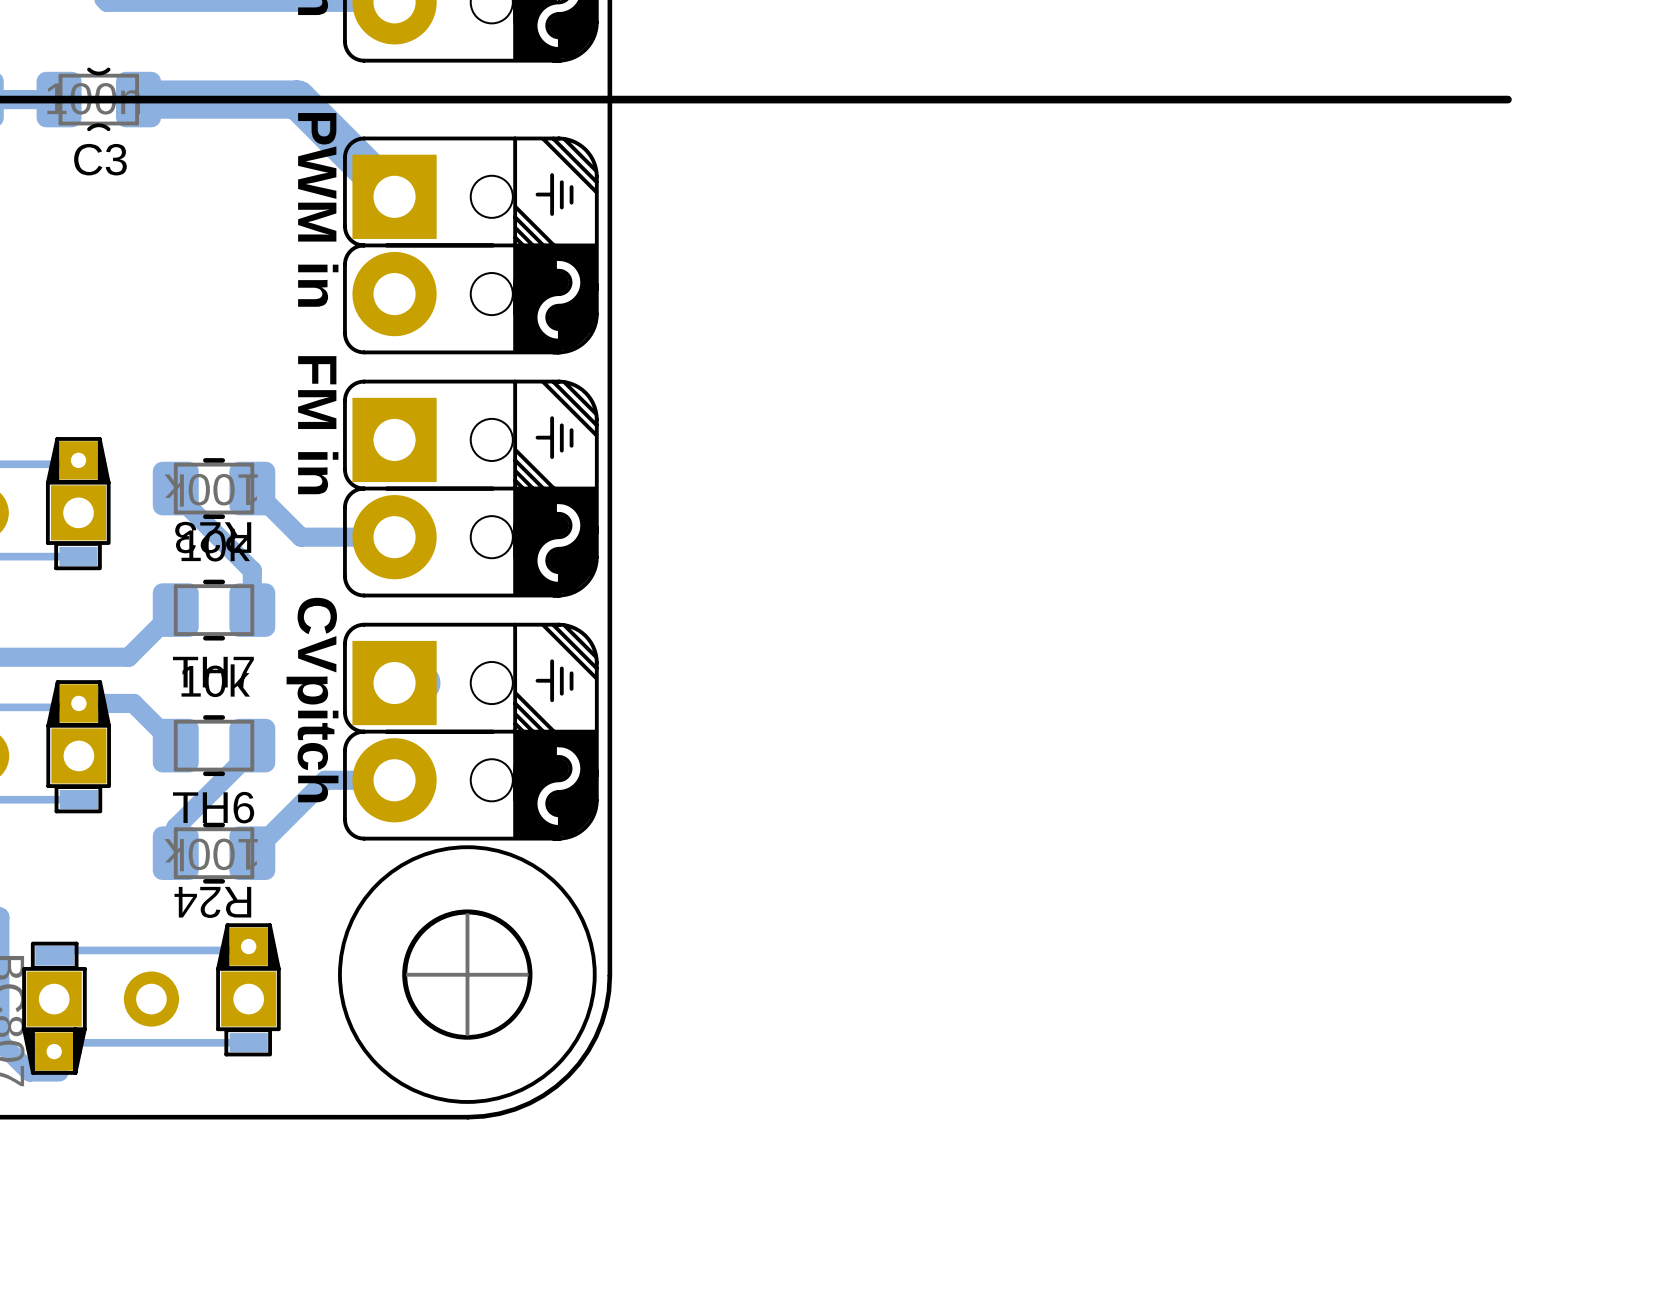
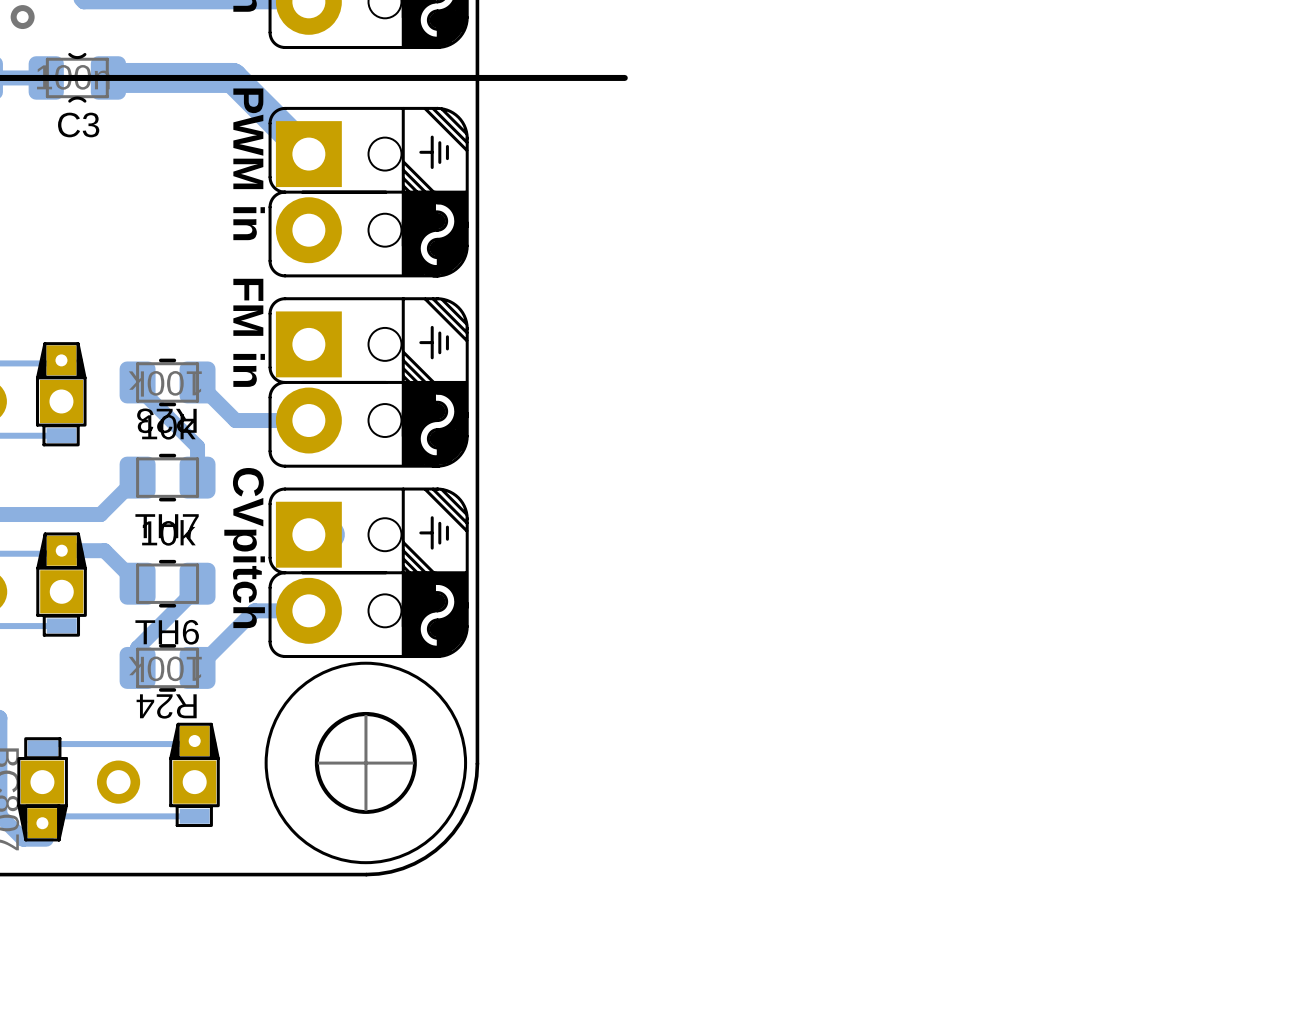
via: none -> (22, 17)
line: (1507, 99) (798, 99) -> none

